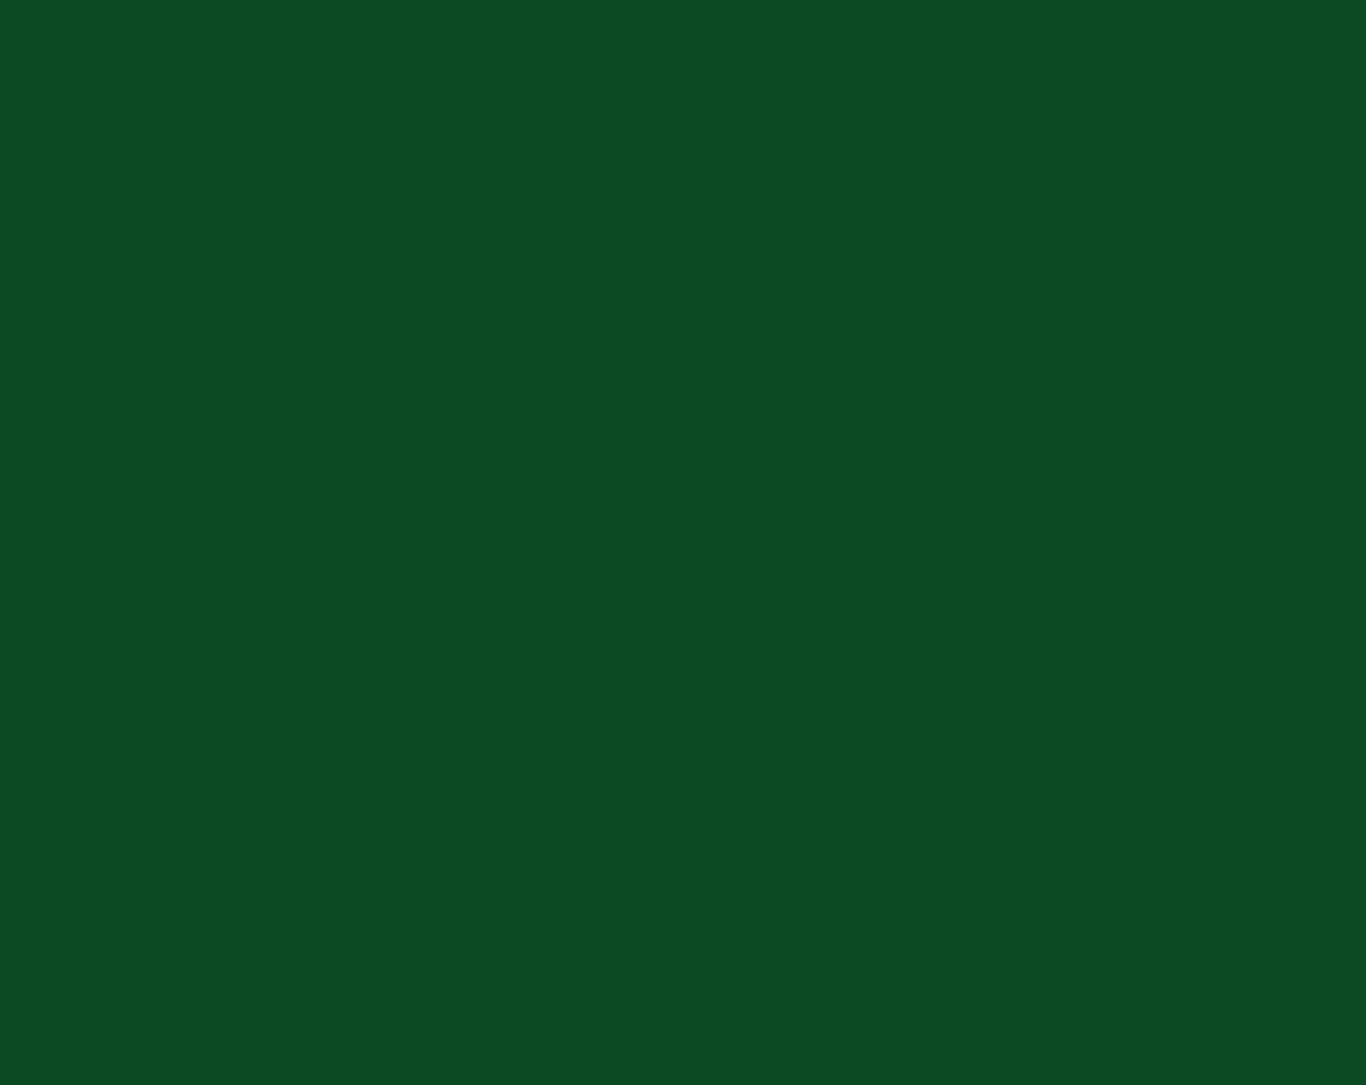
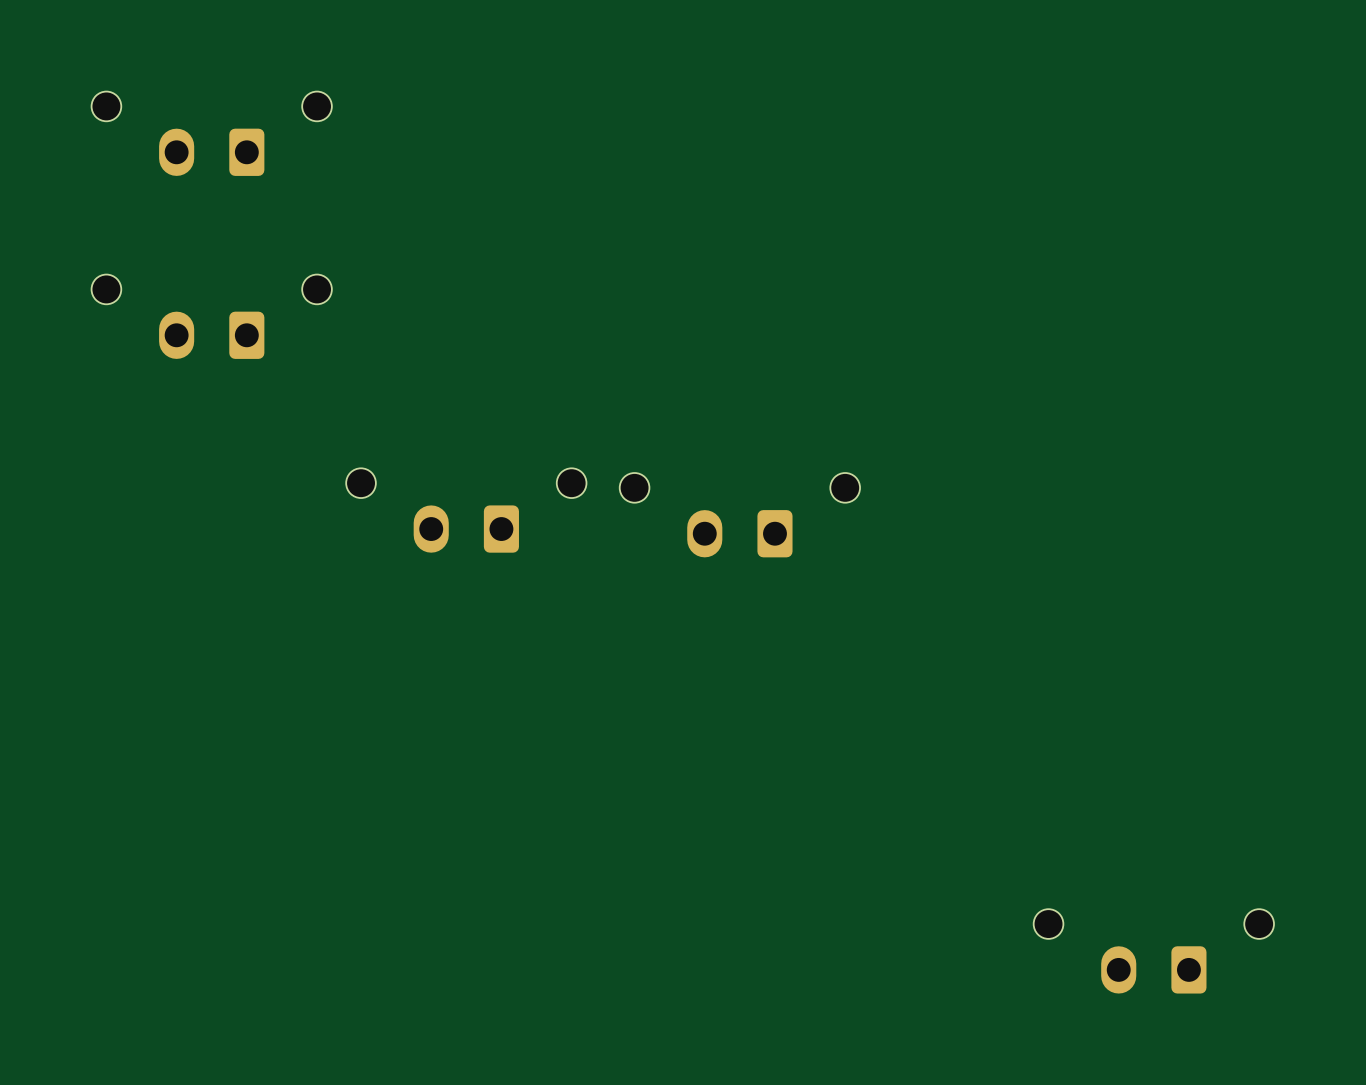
part: none -> (211, 133)
part: none -> (211, 316)
part: none -> (466, 510)
part: none -> (739, 515)
part: none -> (1153, 951)

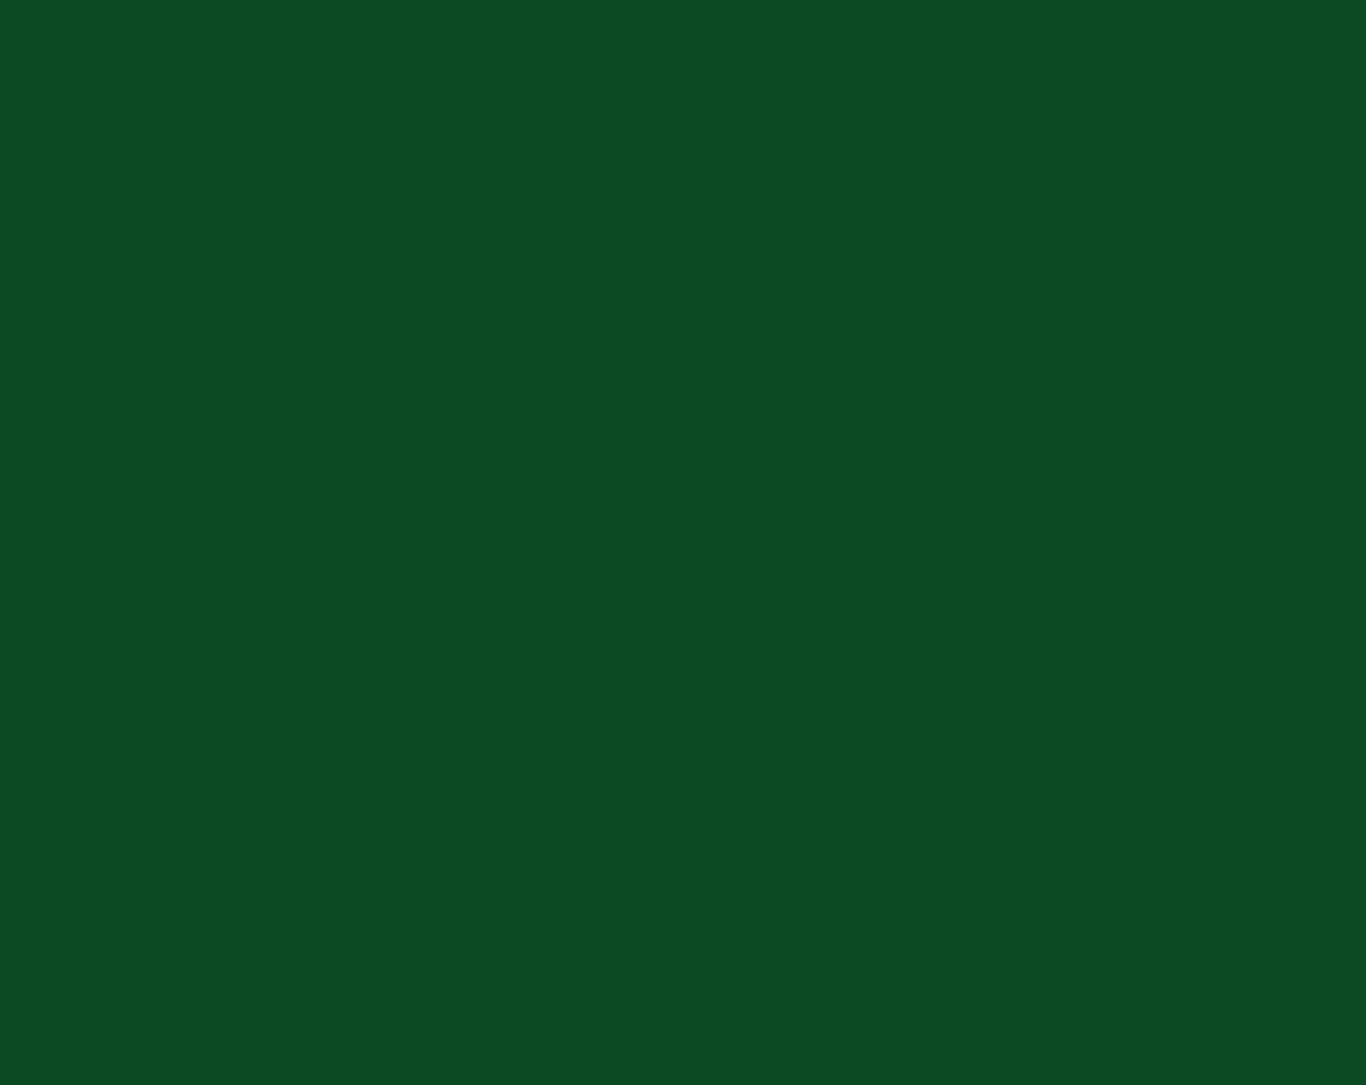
part: (211, 133) -> none
part: (211, 316) -> none
part: (466, 510) -> none
part: (739, 515) -> none
part: (1153, 951) -> none

